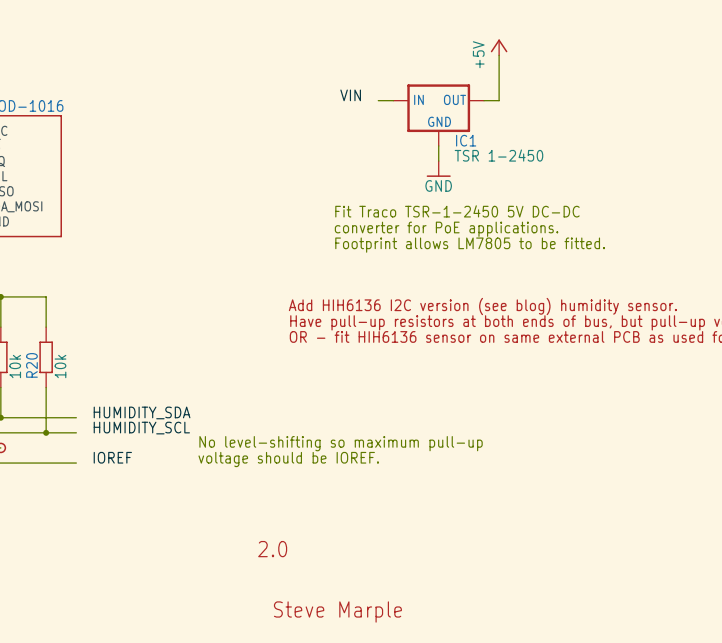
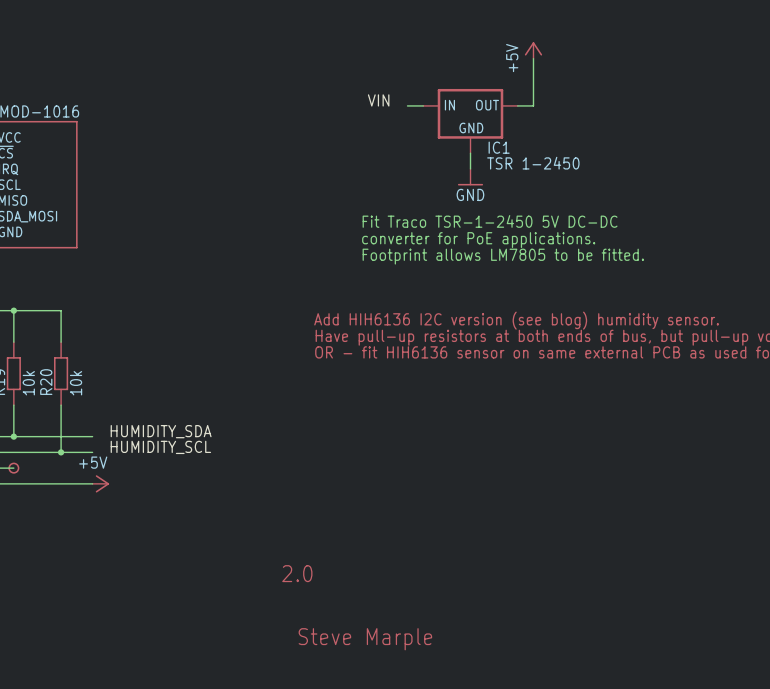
text: No level-shifting so maximum pull-up (341, 443) -> none
label: IOREF (112, 457) -> none
text: voltage should be IOREF. (288, 459) -> none
power symbol: none -> +5V (100, 483)

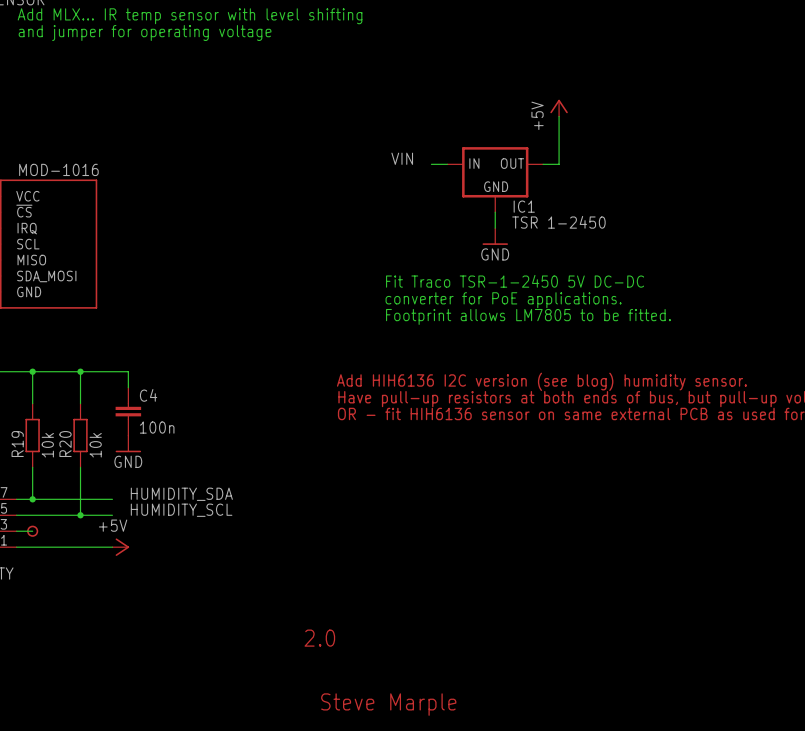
wire: none -> (80, 371) (128, 371) (128, 387)
junction: none -> (80, 371)
C4: none -> 100n (128, 411)
power symbol: none -> GND (128, 443)

